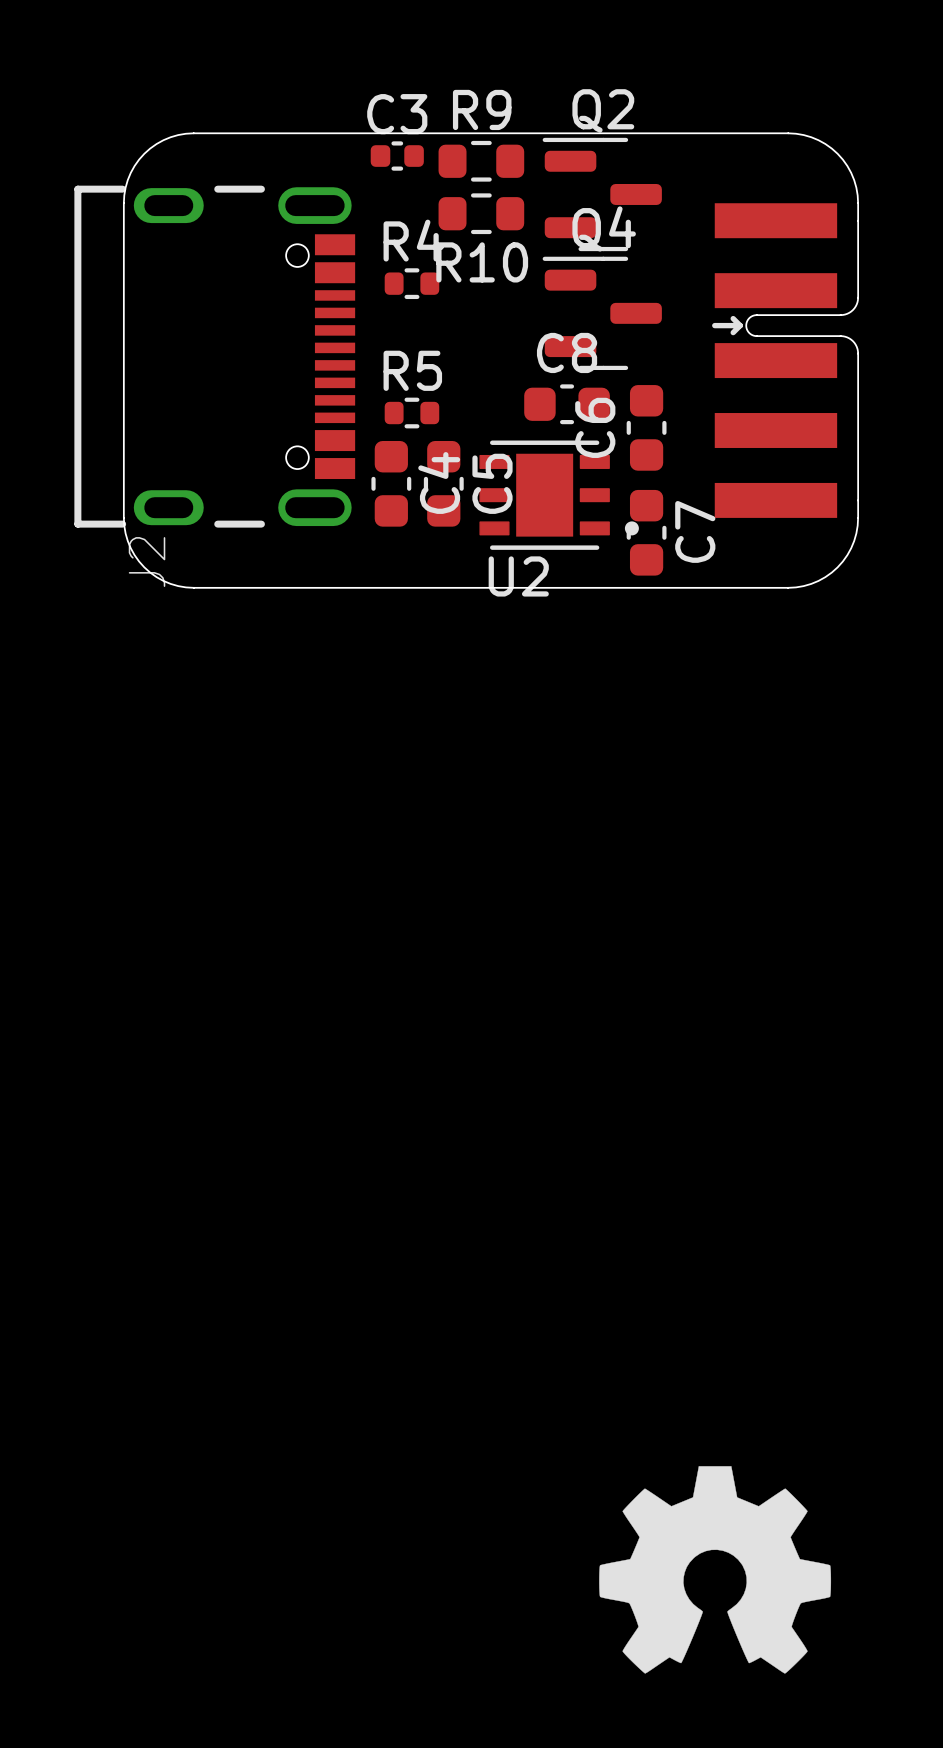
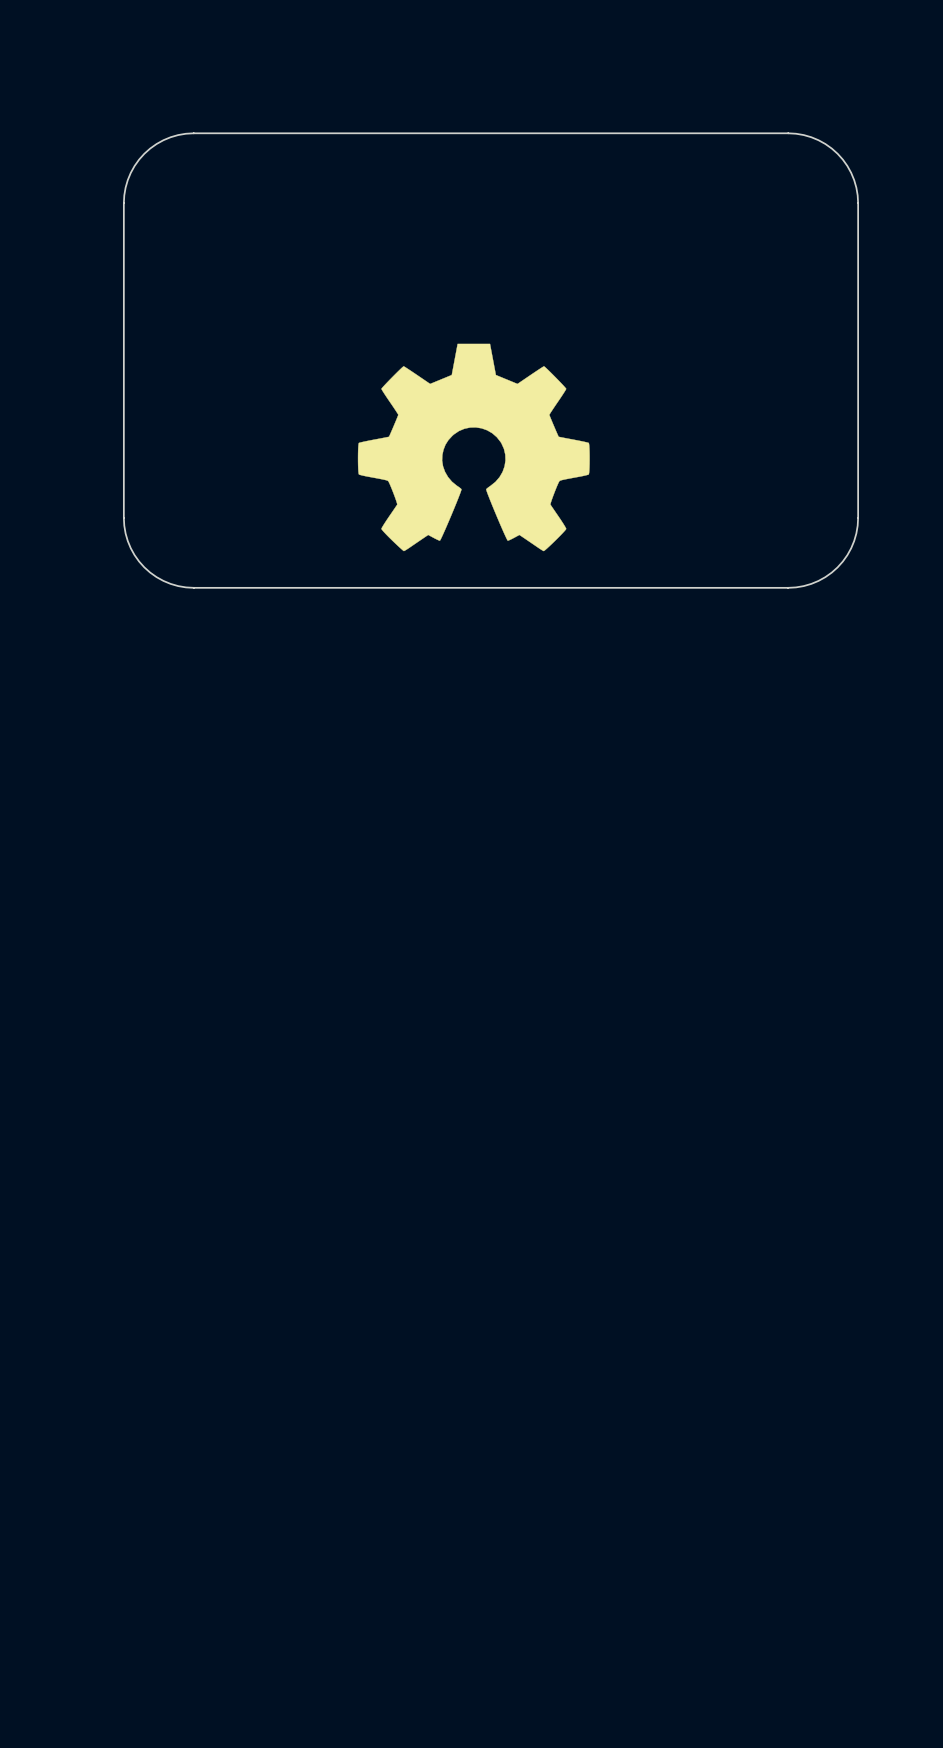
C3: (397, 156) -> none
R9: (481, 161) -> none
Q2: (602, 194) -> none
R10: (481, 213) -> none
board edge: none -> (858, 220) (858, 500)
R4: (411, 283) -> none
Q4: (602, 313) -> none
drawing: none -> [357, 343, 590, 552]
J2: (214, 356) -> none
part: (785, 360) -> none
C8: (567, 404) -> none
R5: (411, 413) -> none
C6: (646, 427) -> none
C4: (391, 483) -> none
C5: (443, 483) -> none
U2: (559, 495) -> none
C7: (646, 532) -> none
drawing: [599, 1466, 832, 1674] -> none

